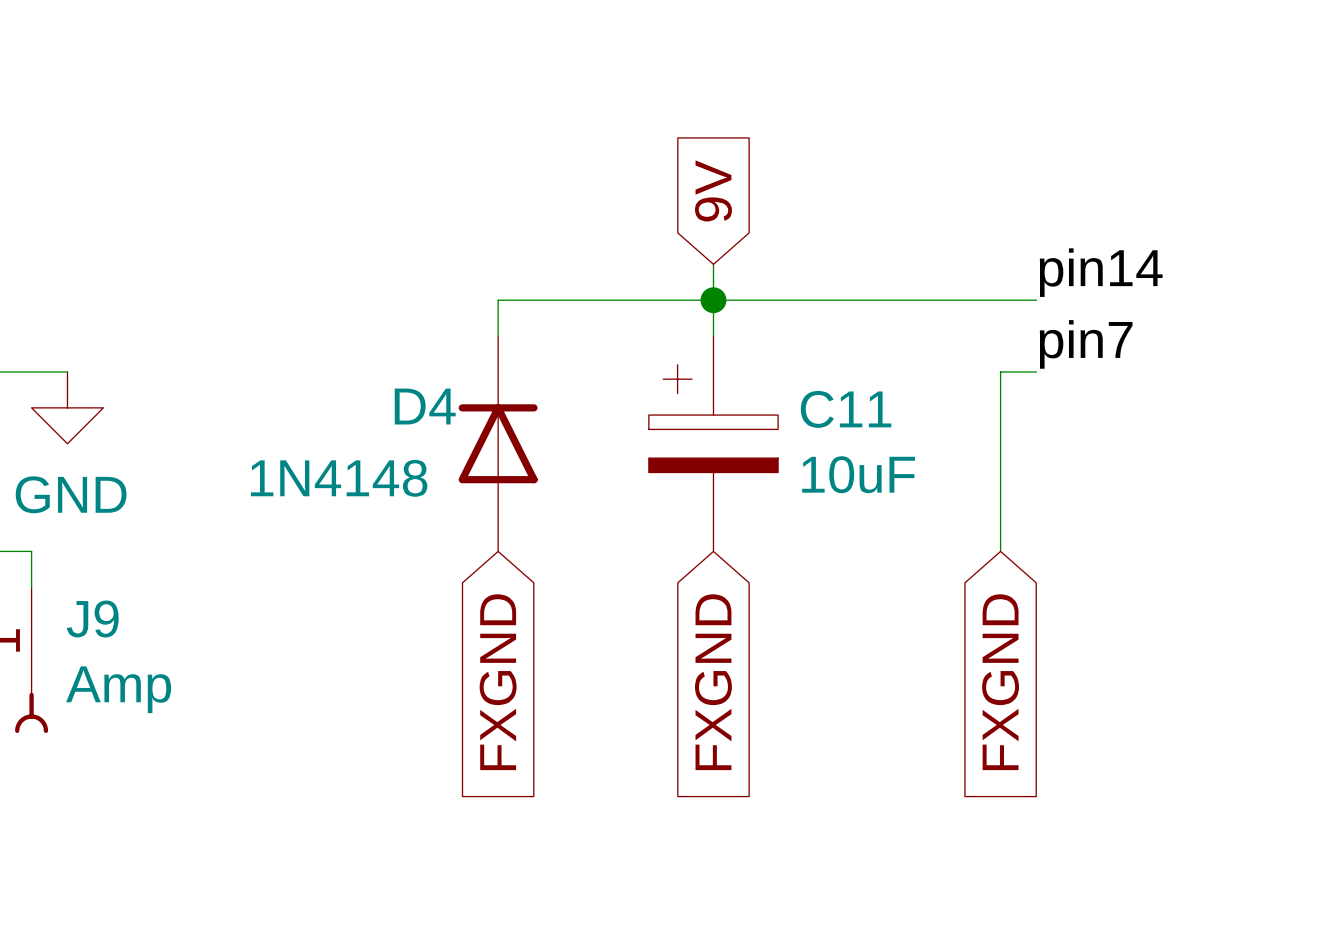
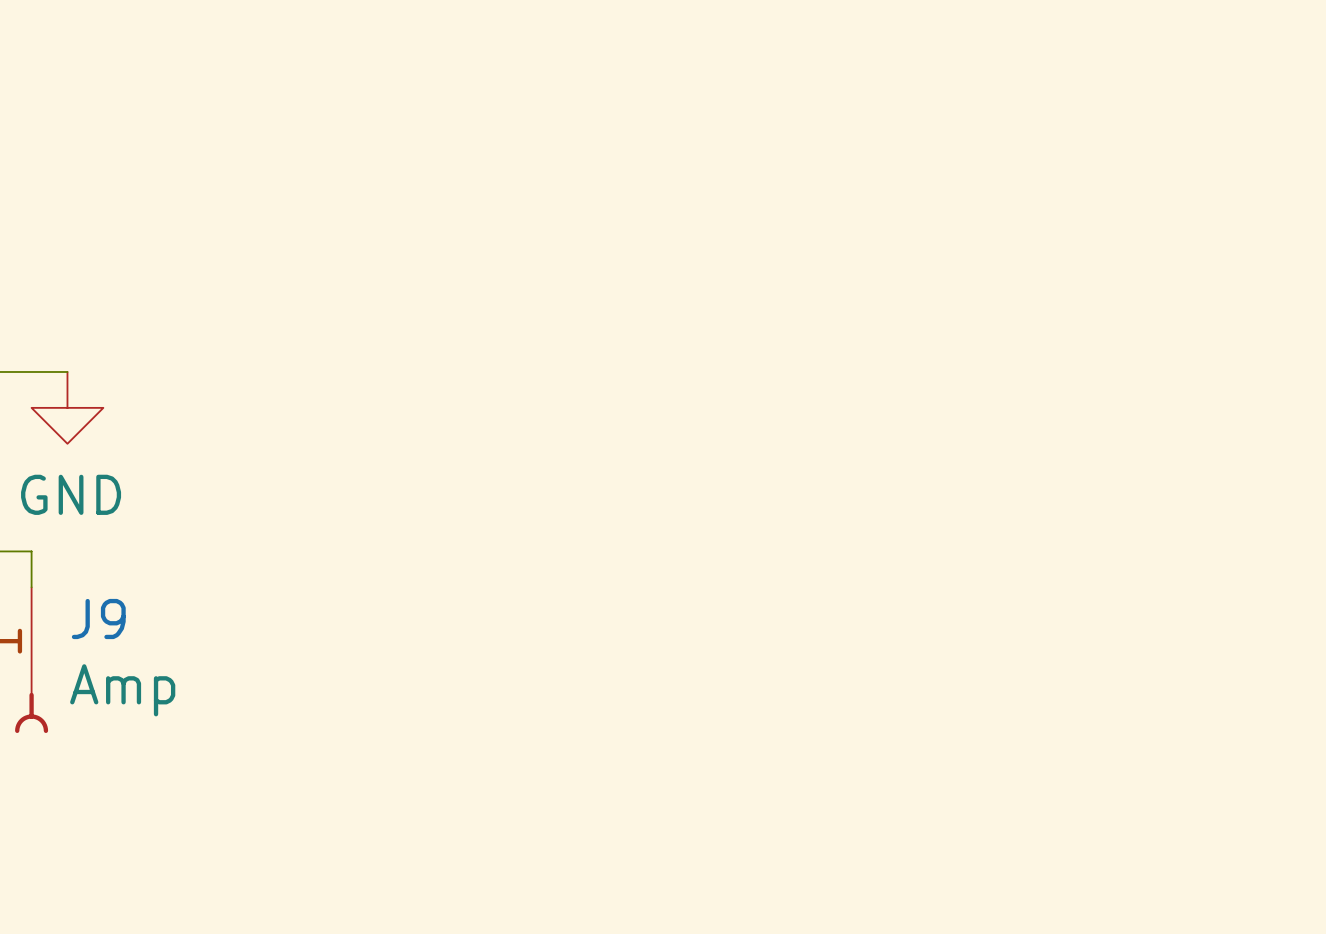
global label: 9V (713, 190) -> none
wire: (713, 264) (713, 336) -> none
label: pin14 (1101, 272) -> none
junction: (713, 300) -> none
wire: (1036, 300) (498, 300) (498, 336) -> none
label: pin7 (1086, 344) -> none
wire: (1036, 371) (1000, 371) (1000, 551) -> none
D4: 1N4148 (498, 443) -> none
C11: 10uF (713, 443) -> none
global label: FXGND (498, 682) -> none
global label: FXGND (713, 682) -> none
global label: FXGND (1000, 682) -> none

